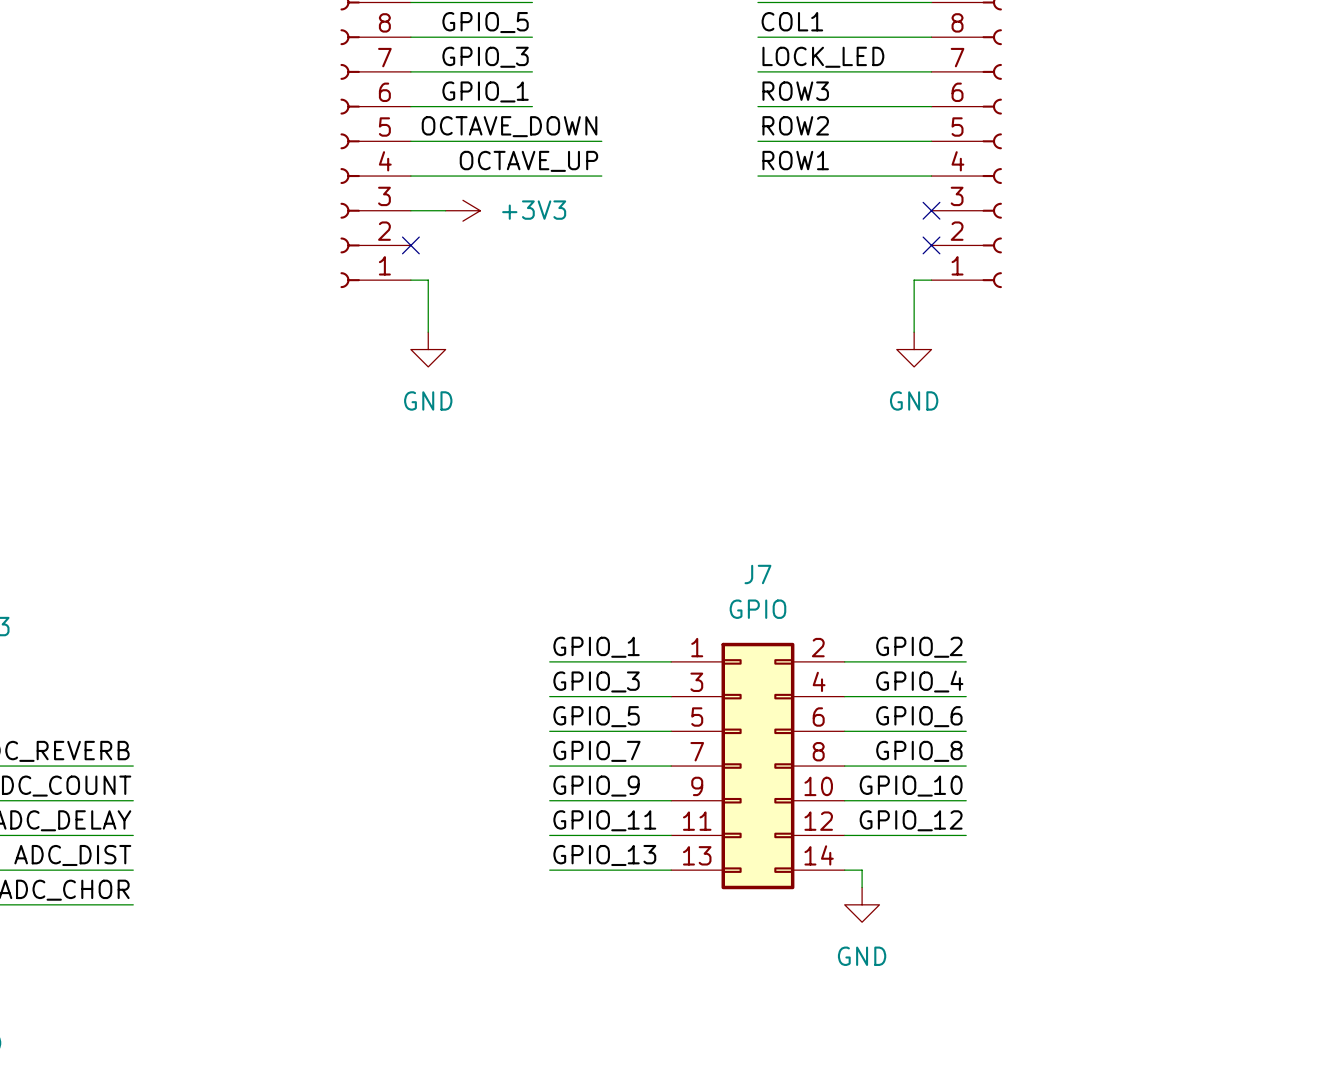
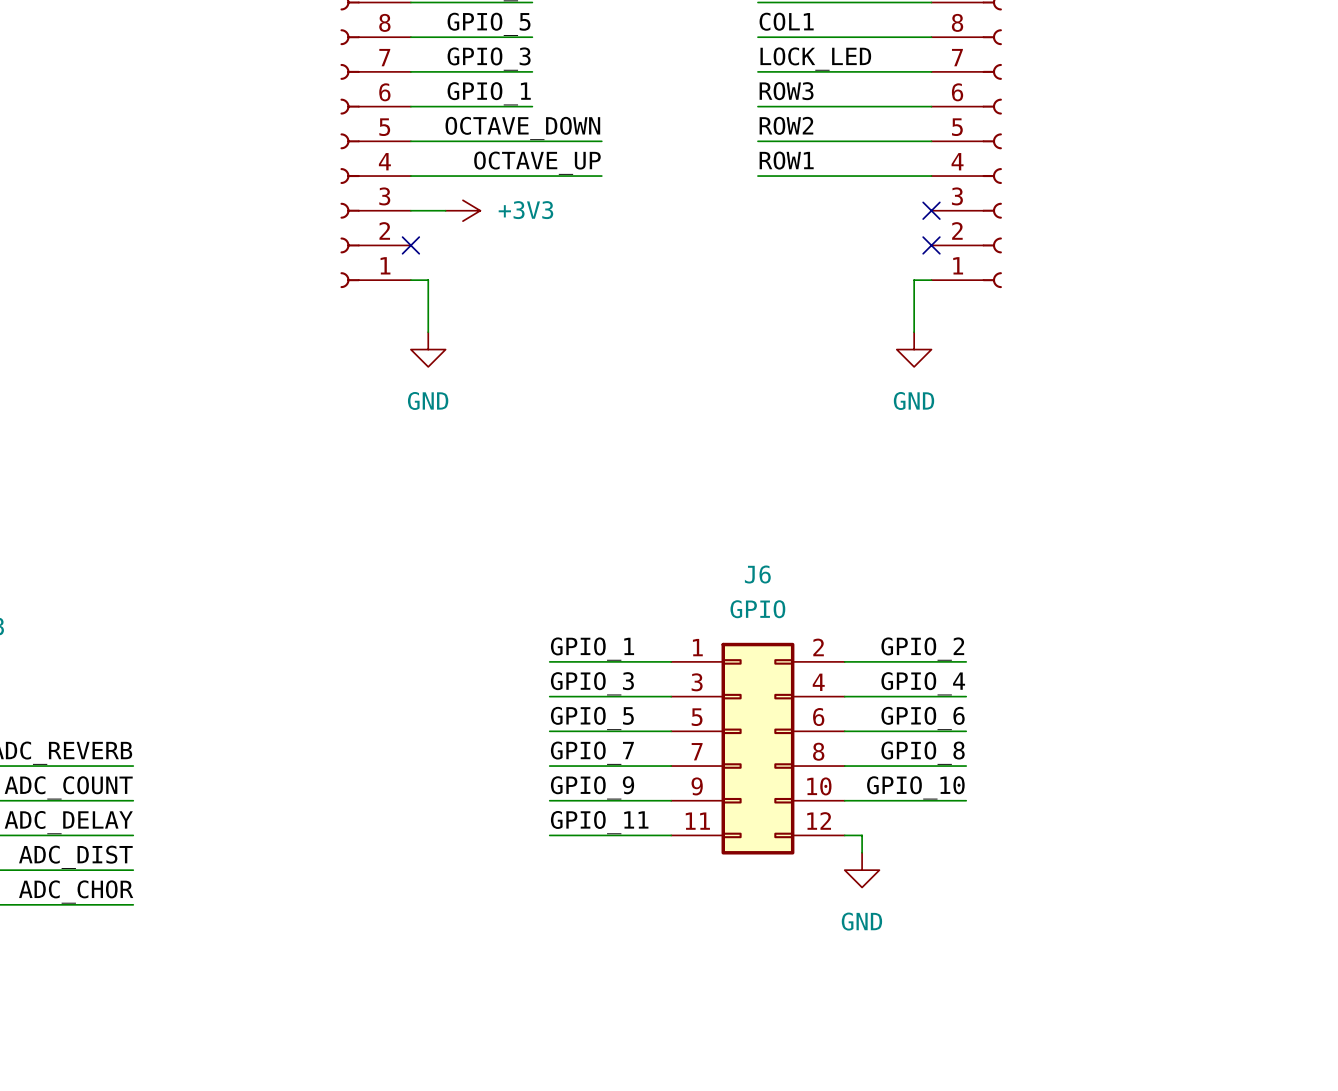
J6: none -> GPIO (757, 748)
J7: GPIO (757, 766) -> none
label: GPIO_12 (911, 820) -> none
wire: (862, 835) (966, 835) -> (862, 835) (862, 852)
label: GPIO_13 (604, 855) -> none
wire: (549, 870) (671, 870) -> none
wire: (844, 870) (862, 870) (862, 887) -> none
power symbol position: GND (862, 904) -> GND (862, 870)

